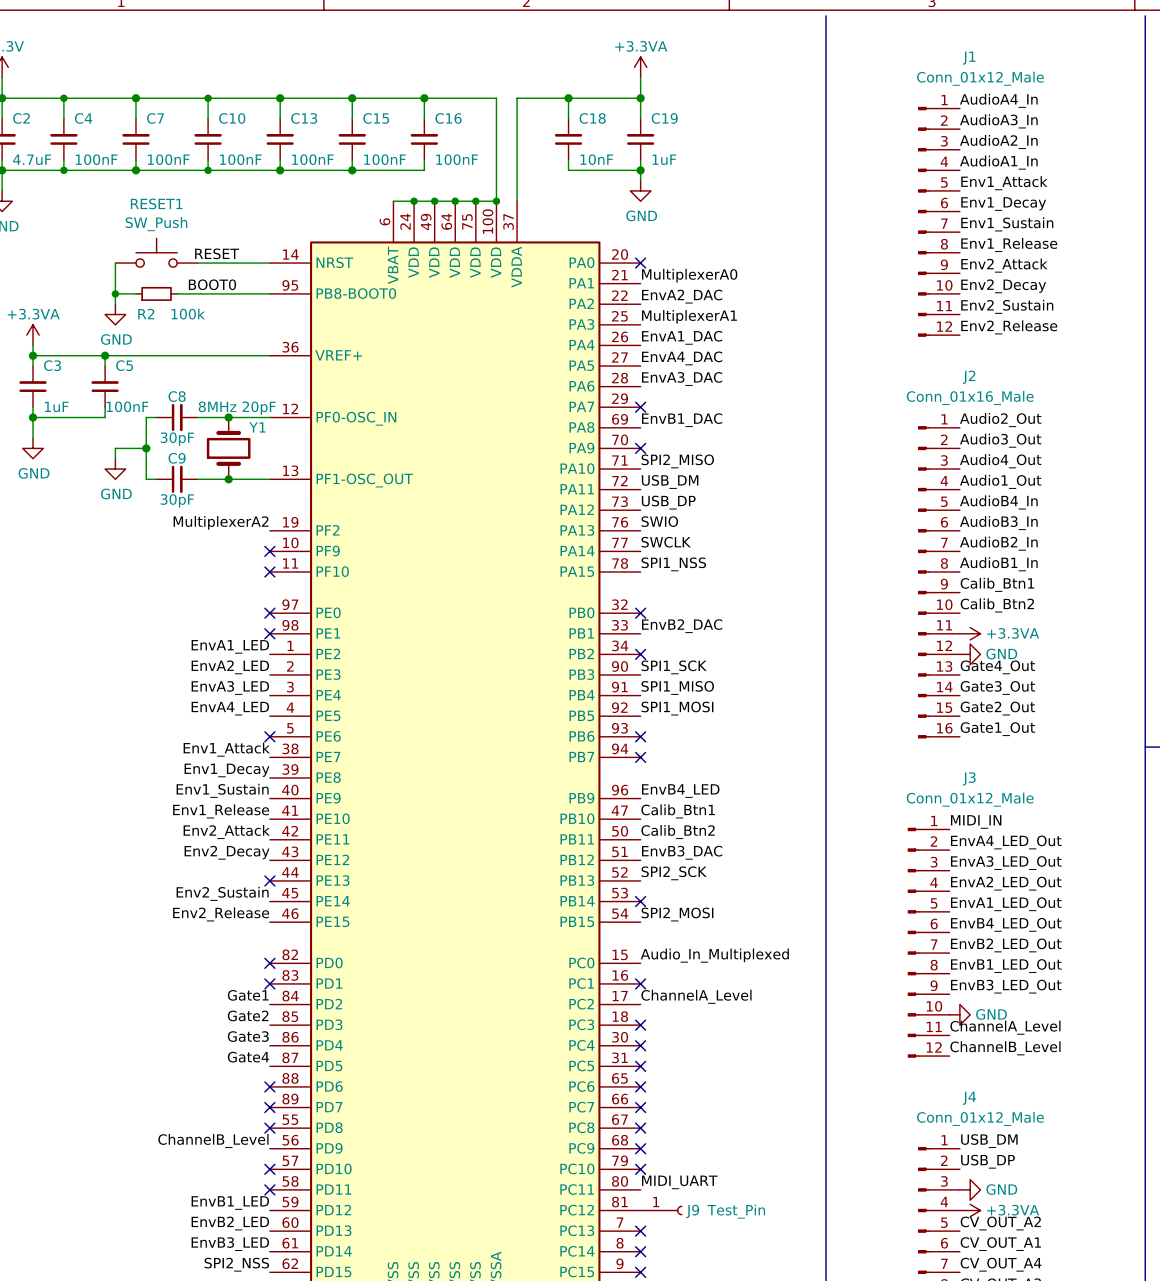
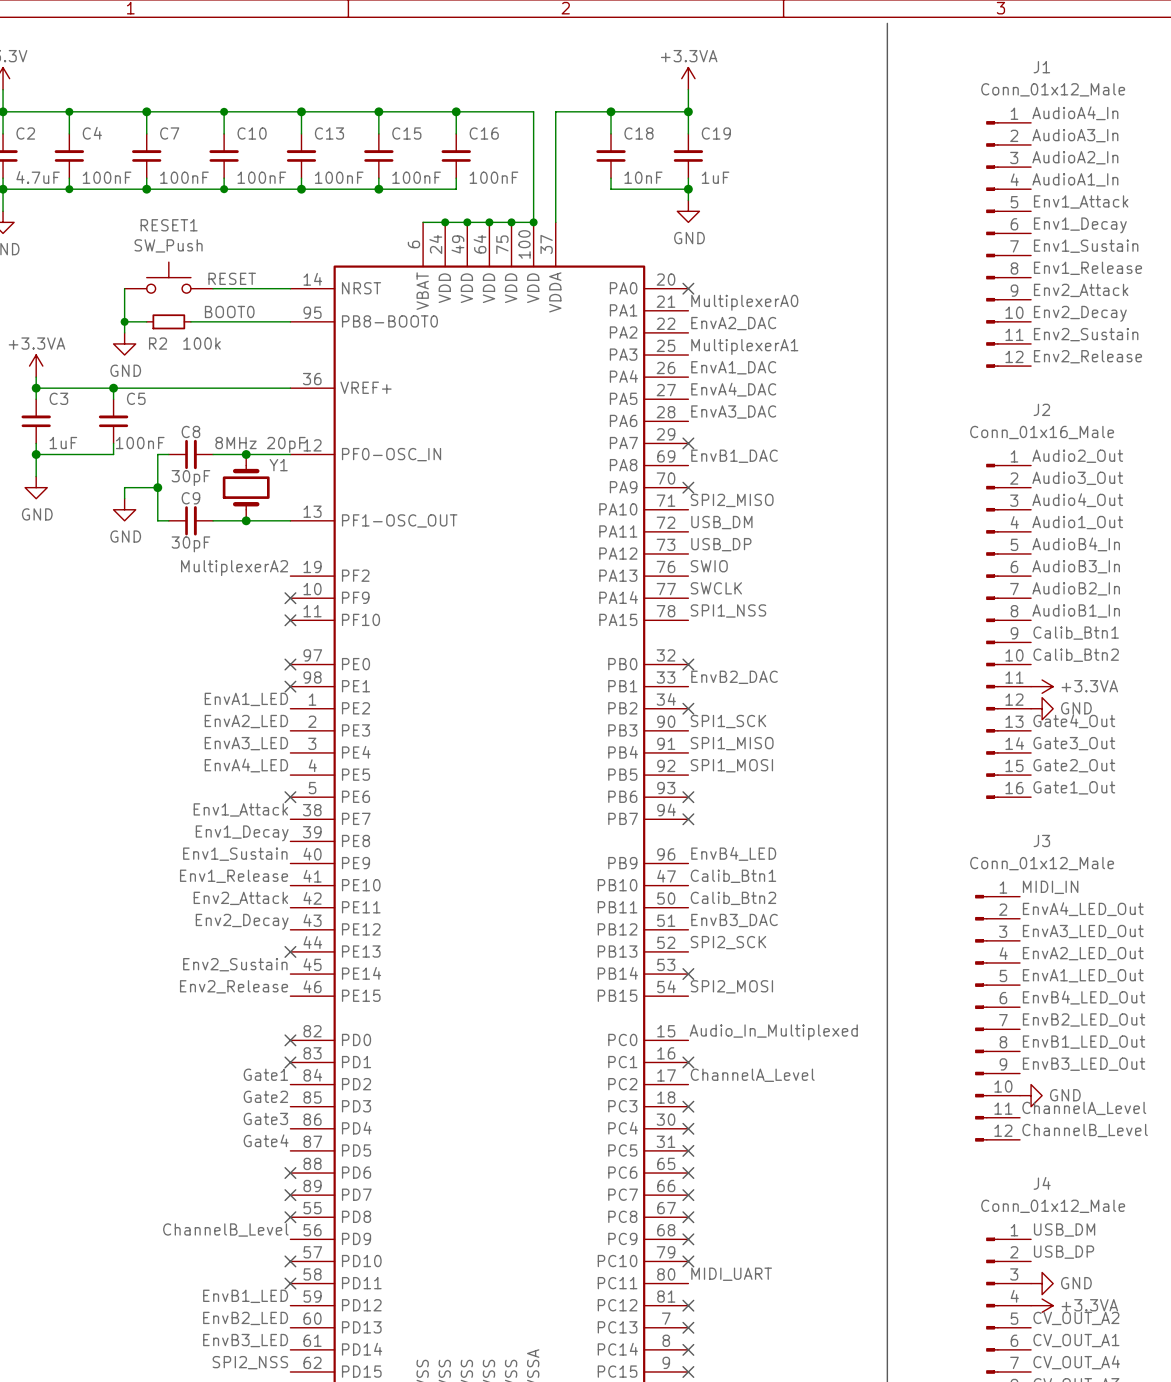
no-connect mark: none -> (688, 1305)
J9: Test_Pin (661, 1210) -> none

